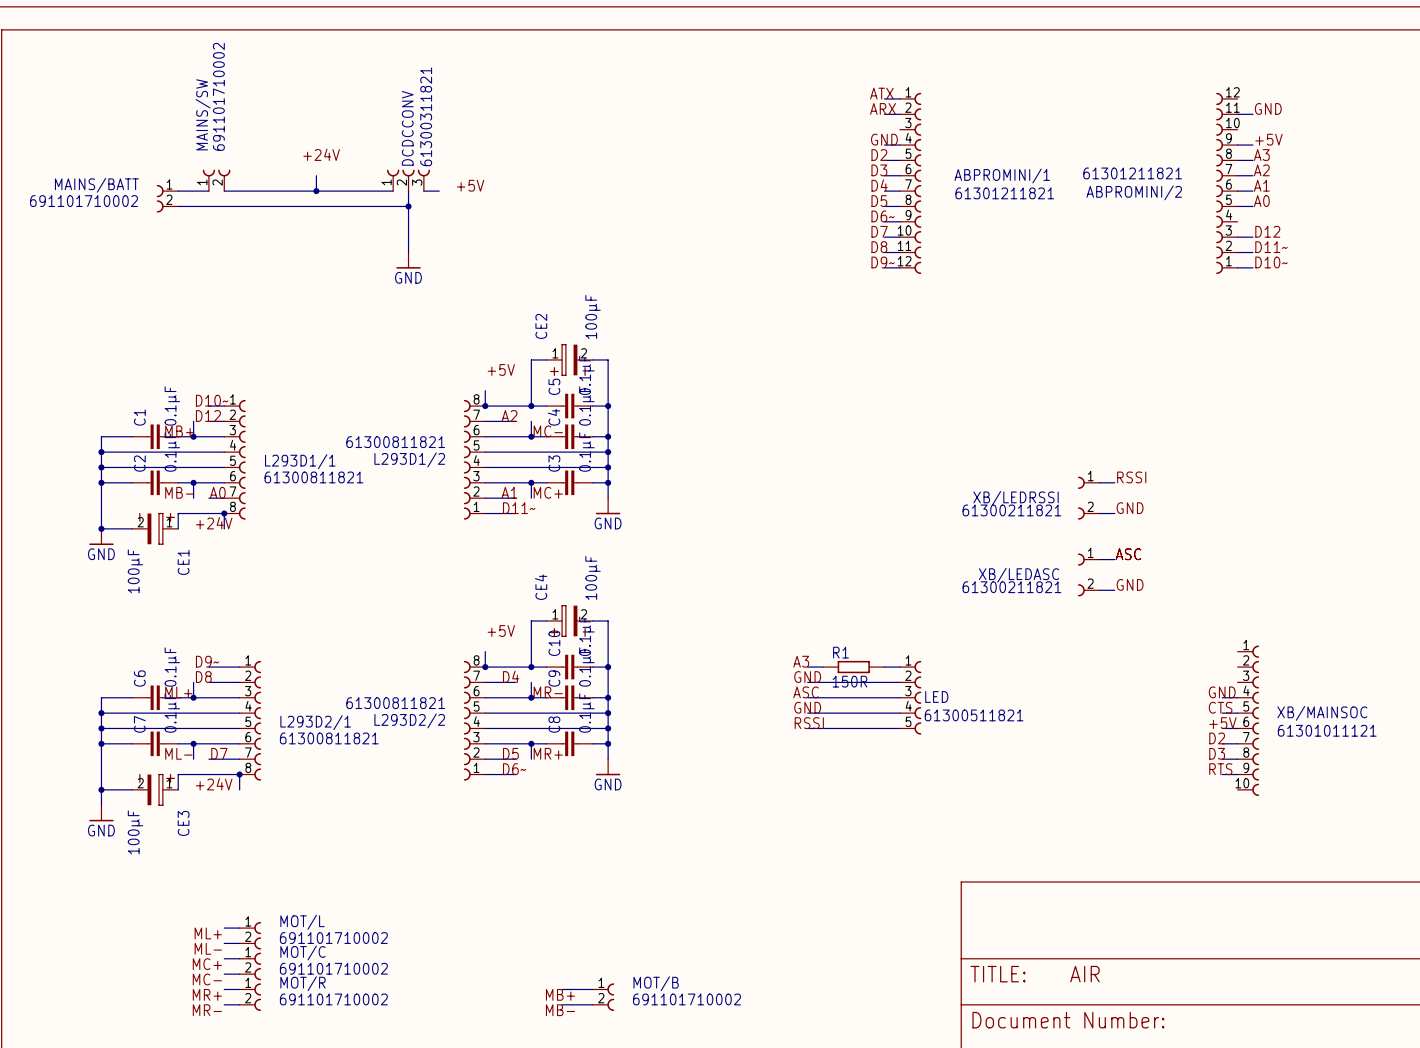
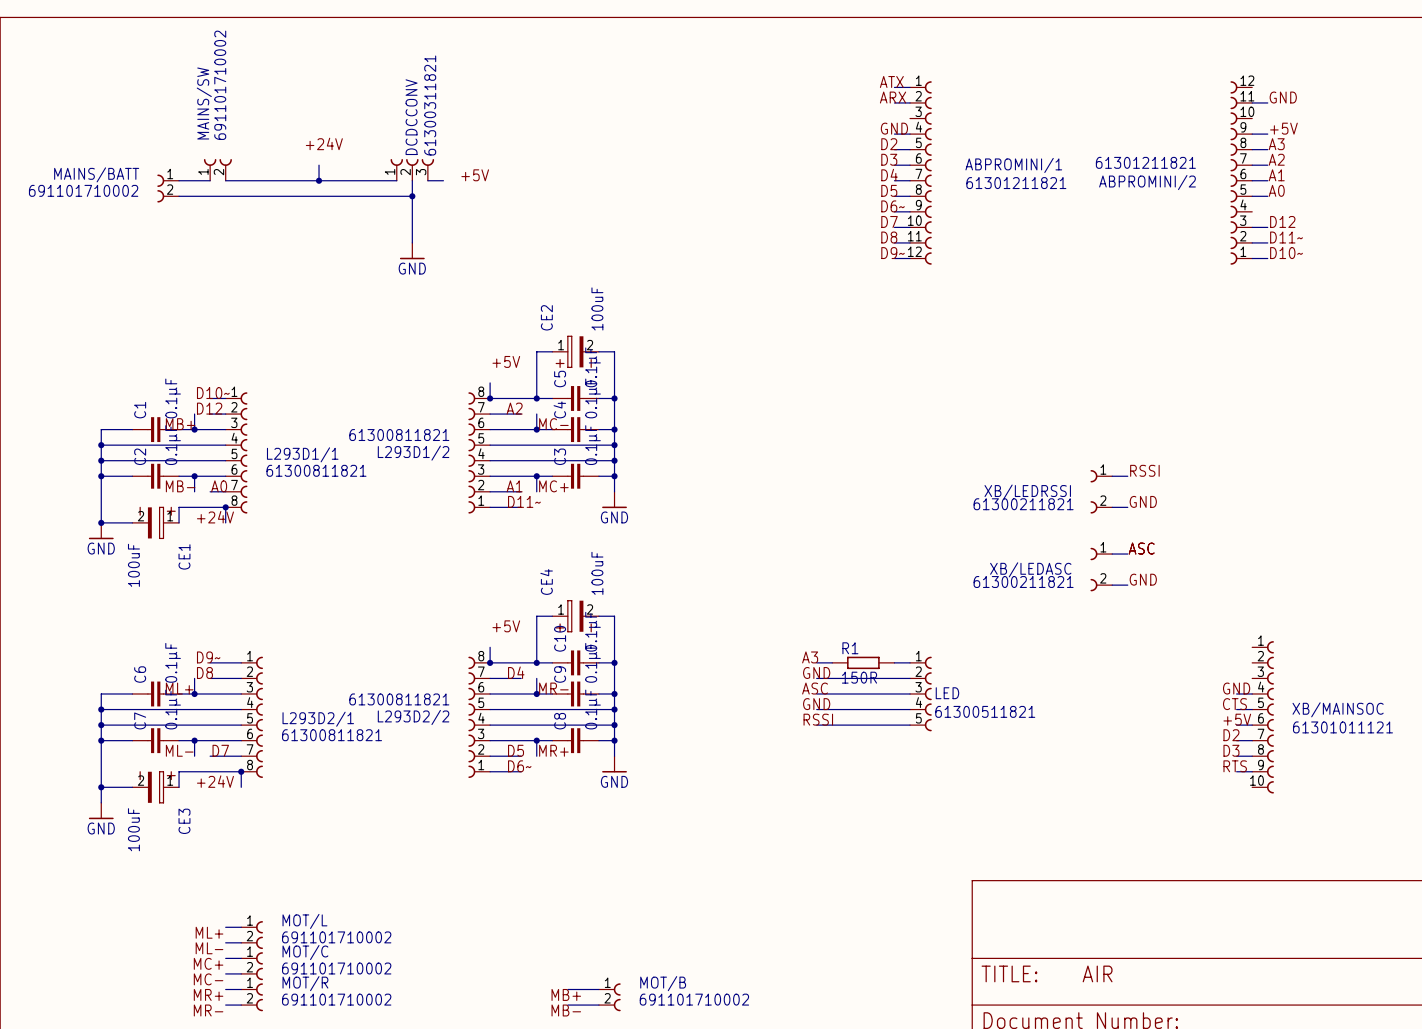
CE2 value: 100µF (593, 316) -> 100uF (597, 308)
CE1 value: 100µF (135, 571) -> 100uF (133, 565)
CE4 value: 100µF (593, 577) -> 100uF (597, 573)
CE3 value: 100µF (135, 832) -> 100uF (133, 829)

